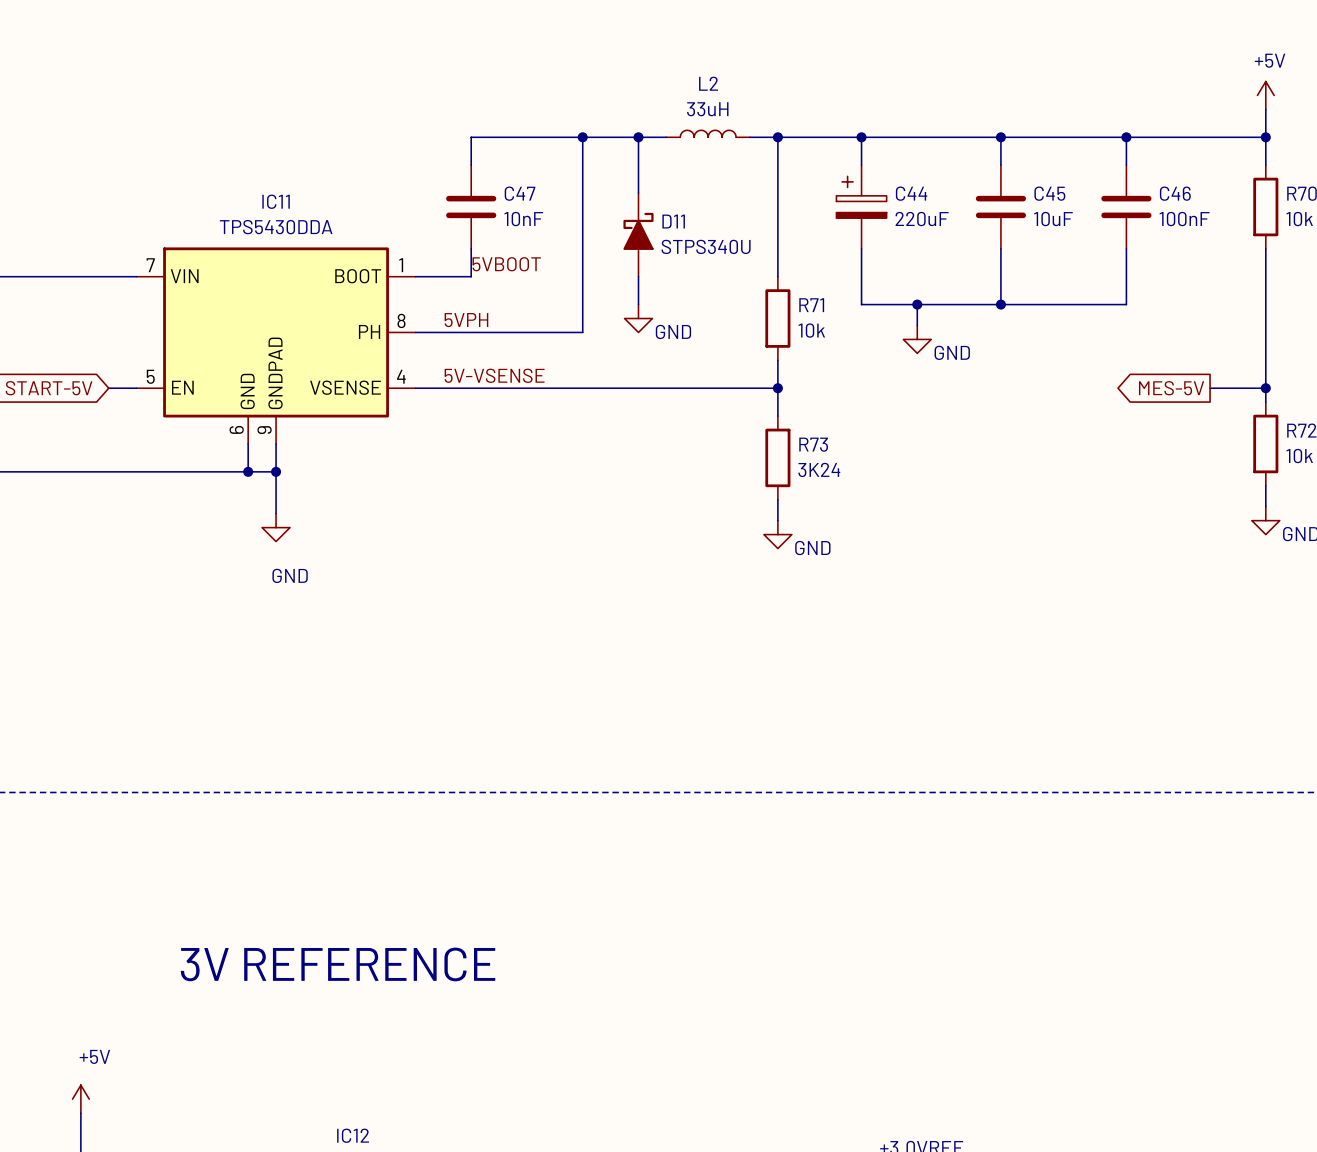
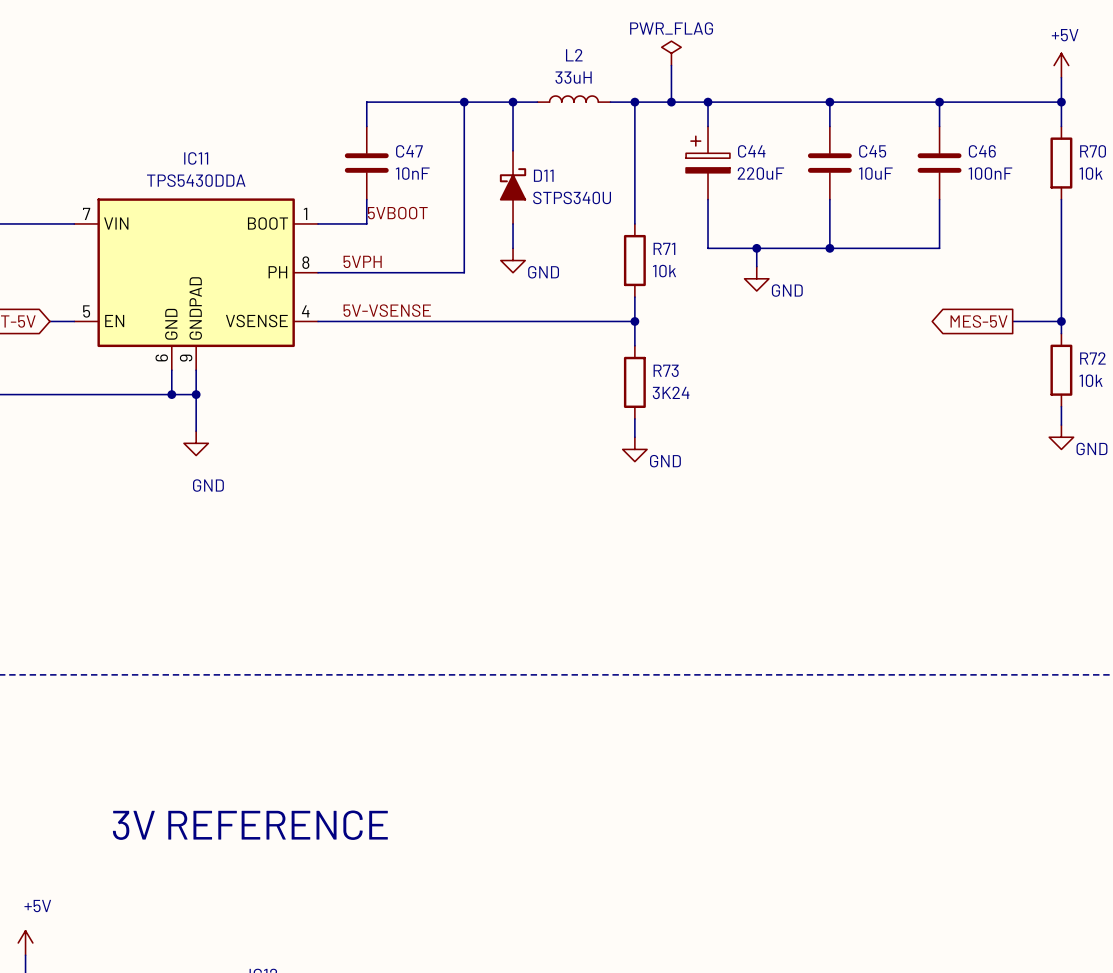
power symbol: none -> PWR_FLAG (671, 53)
wire: none -> (671, 65) (671, 102)
junction: none -> (671, 102)

